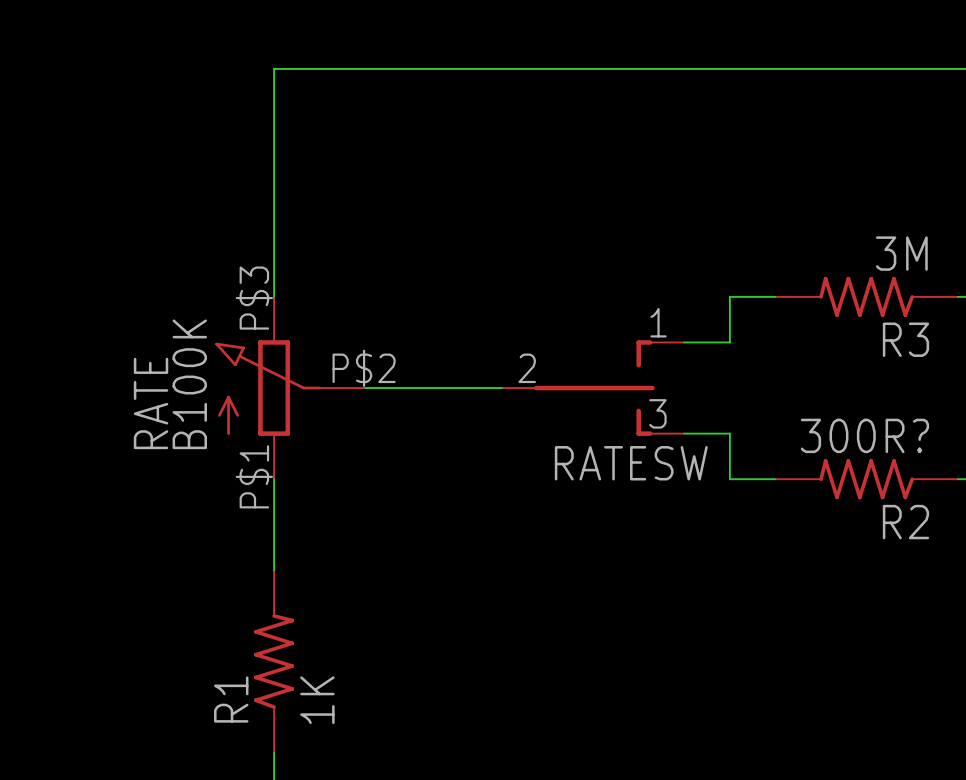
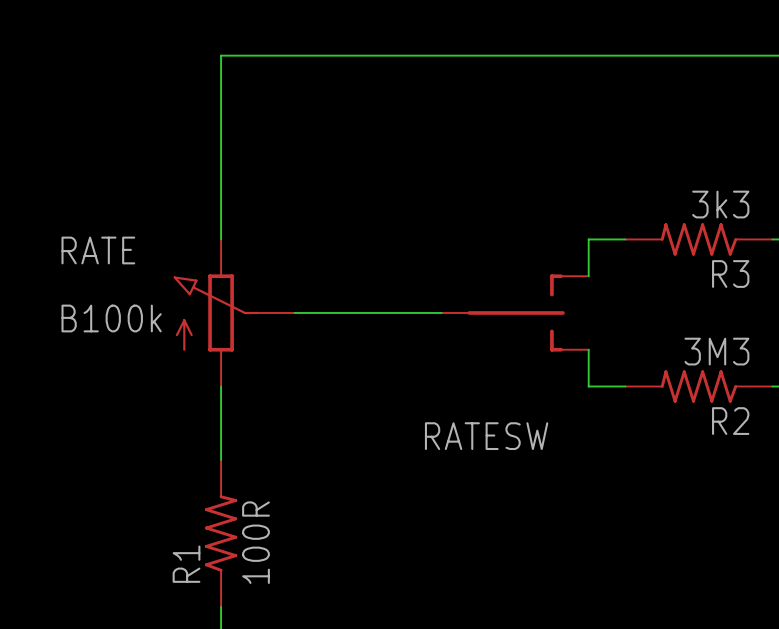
R3 value: 3M (901, 253) -> 3k3 (720, 204)
RATE pin number: P$3 (254, 298) -> none
RATE pin number: P$2 (364, 368) -> none
RATE value: B100K (189, 384) -> B100k (111, 318)
RATESW: (593, 388) -> none
RATESW: none -> (515, 312)
RATE name rotation: 0° (151, 403) -> 90° clockwise (98, 250)
R2 value: 300R? (864, 435) -> 3M3 (716, 351)
RATE pin number: P$1 (254, 476) -> none
R1 value: 1K (317, 700) -> 100R (255, 542)

